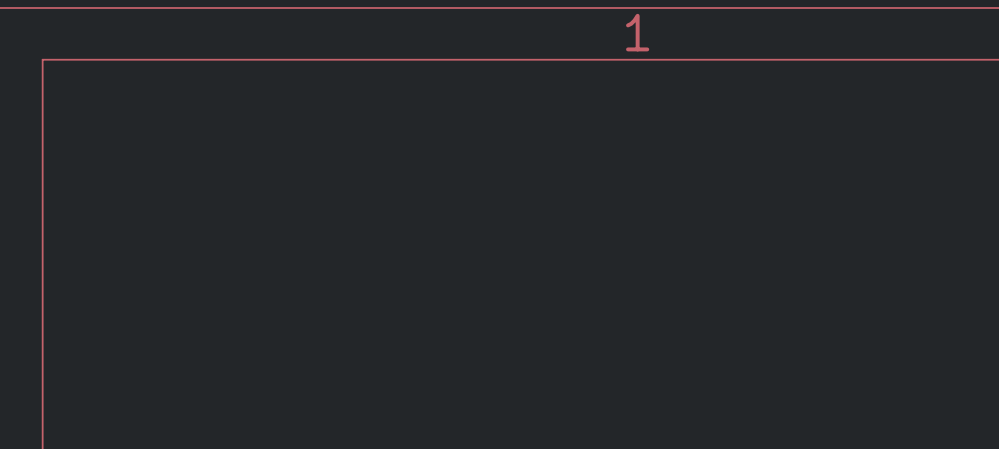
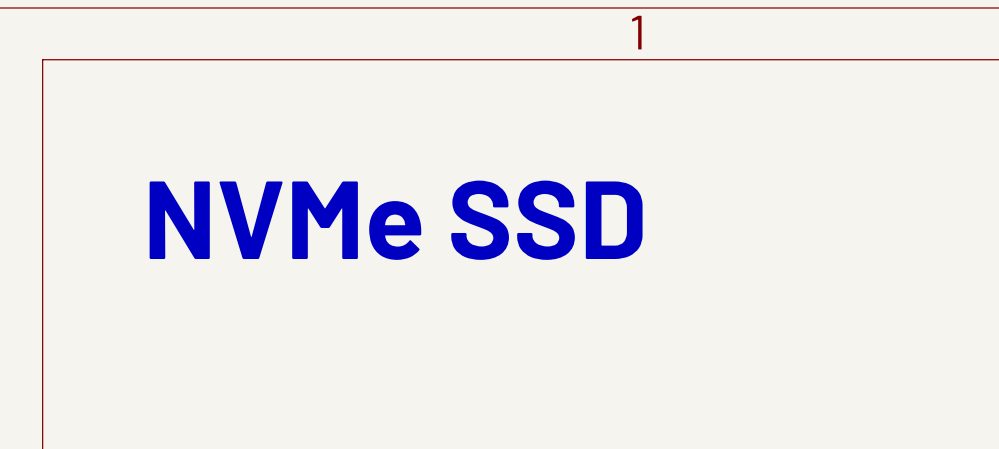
text: none -> NVMe SSD (396, 220)

